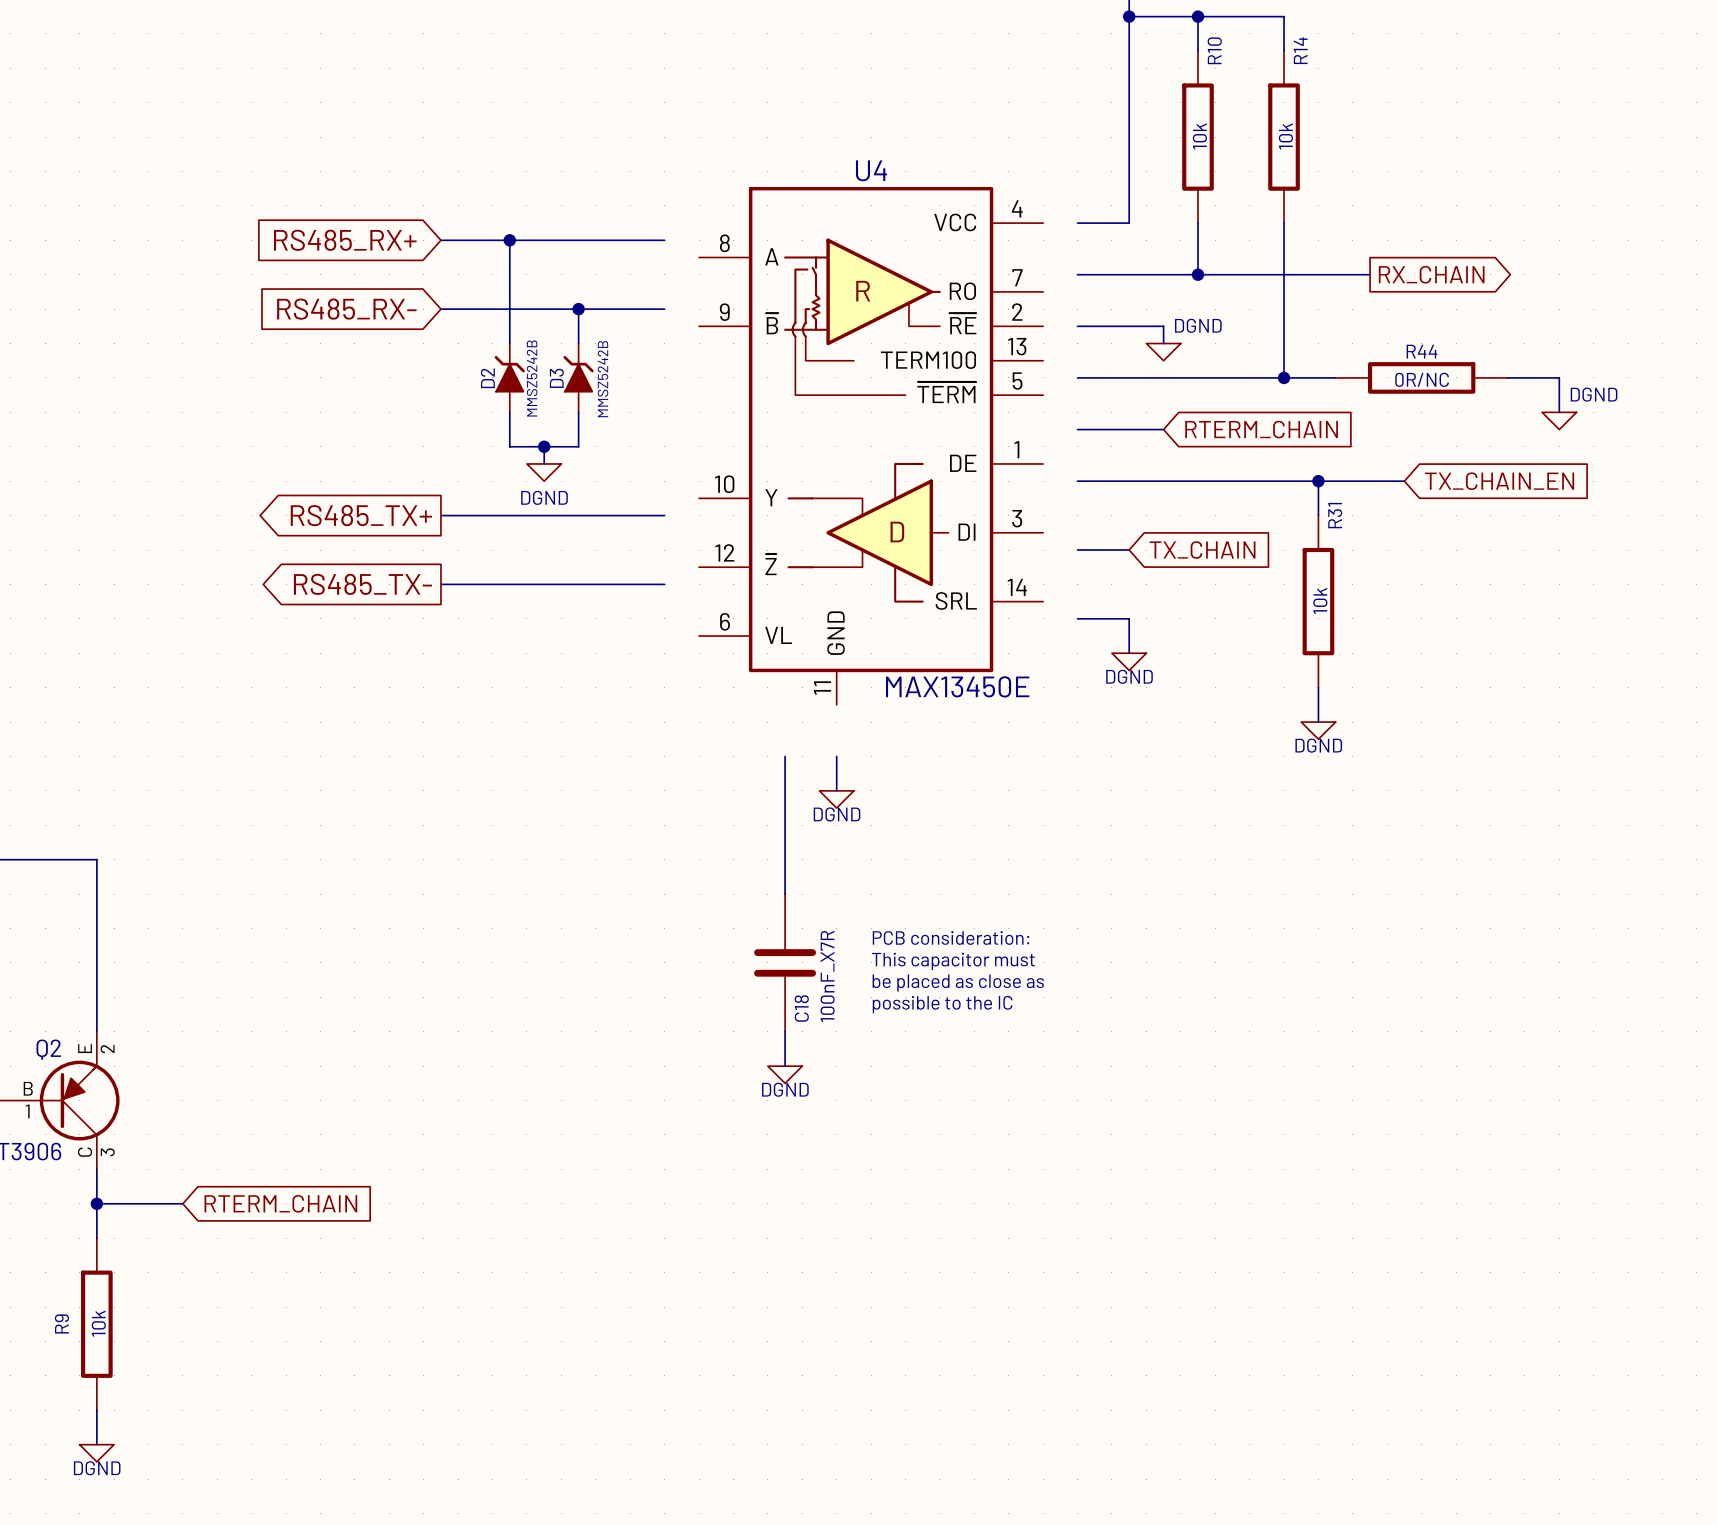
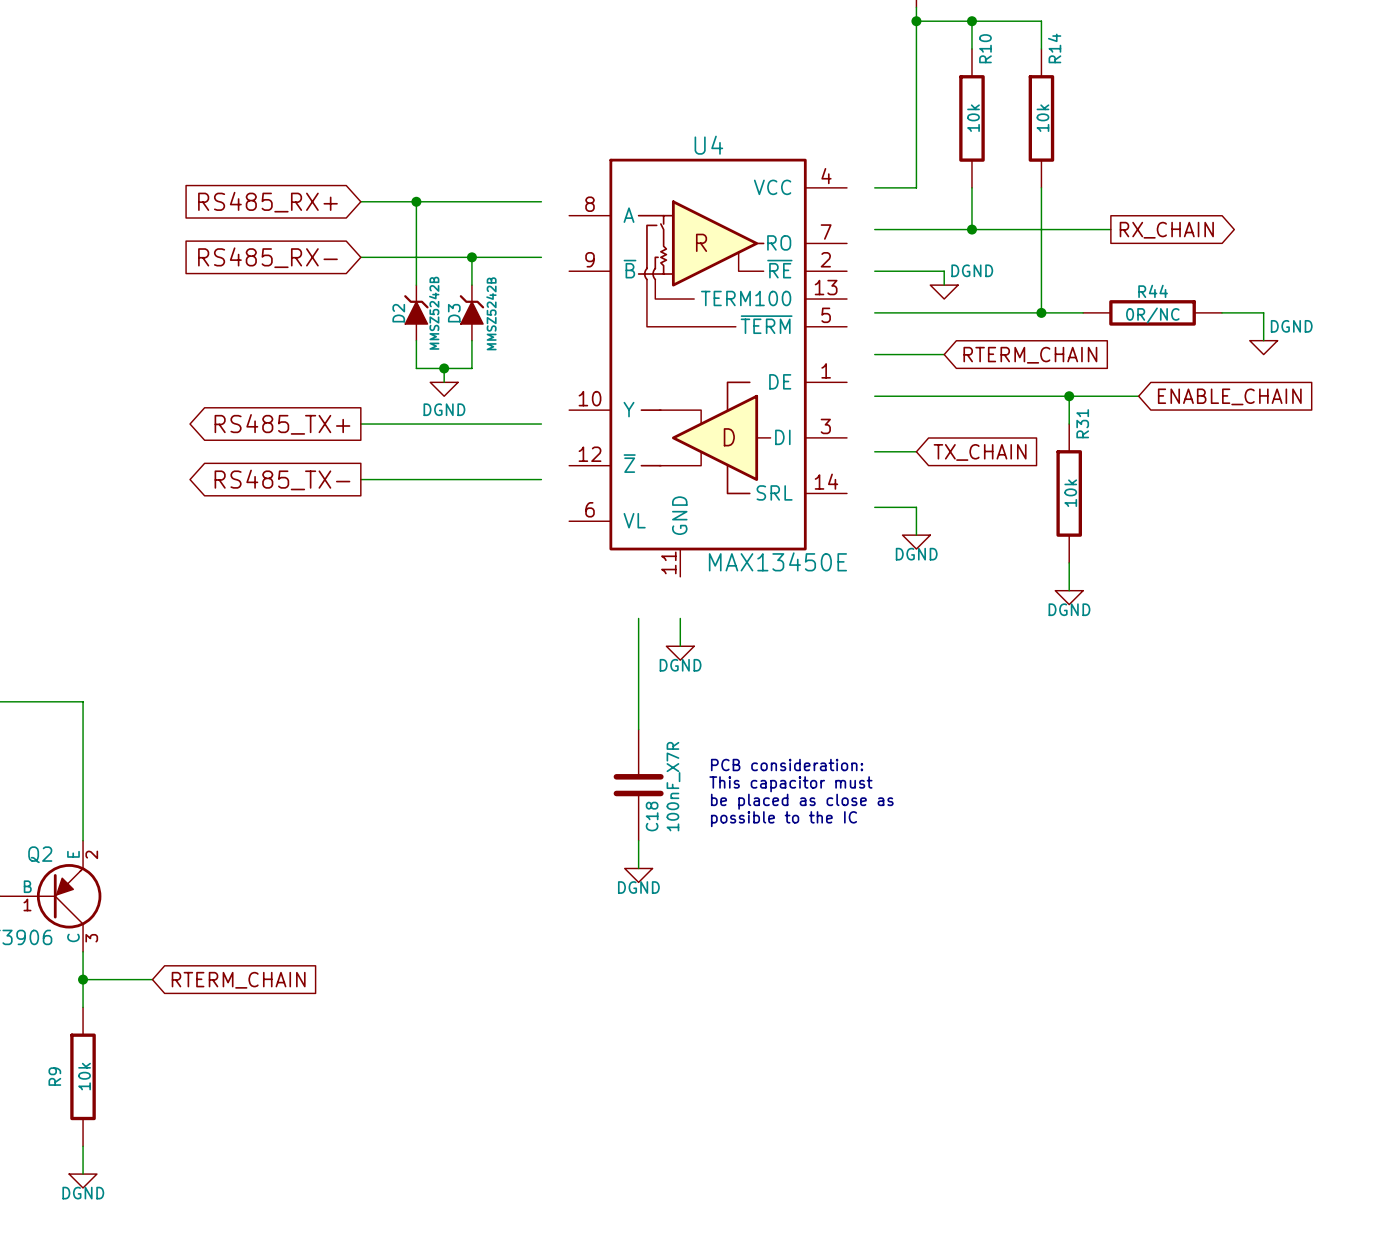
global label: TX_CHAIN_EN (1499, 481) -> ENABLE_CHAIN (1229, 396)

